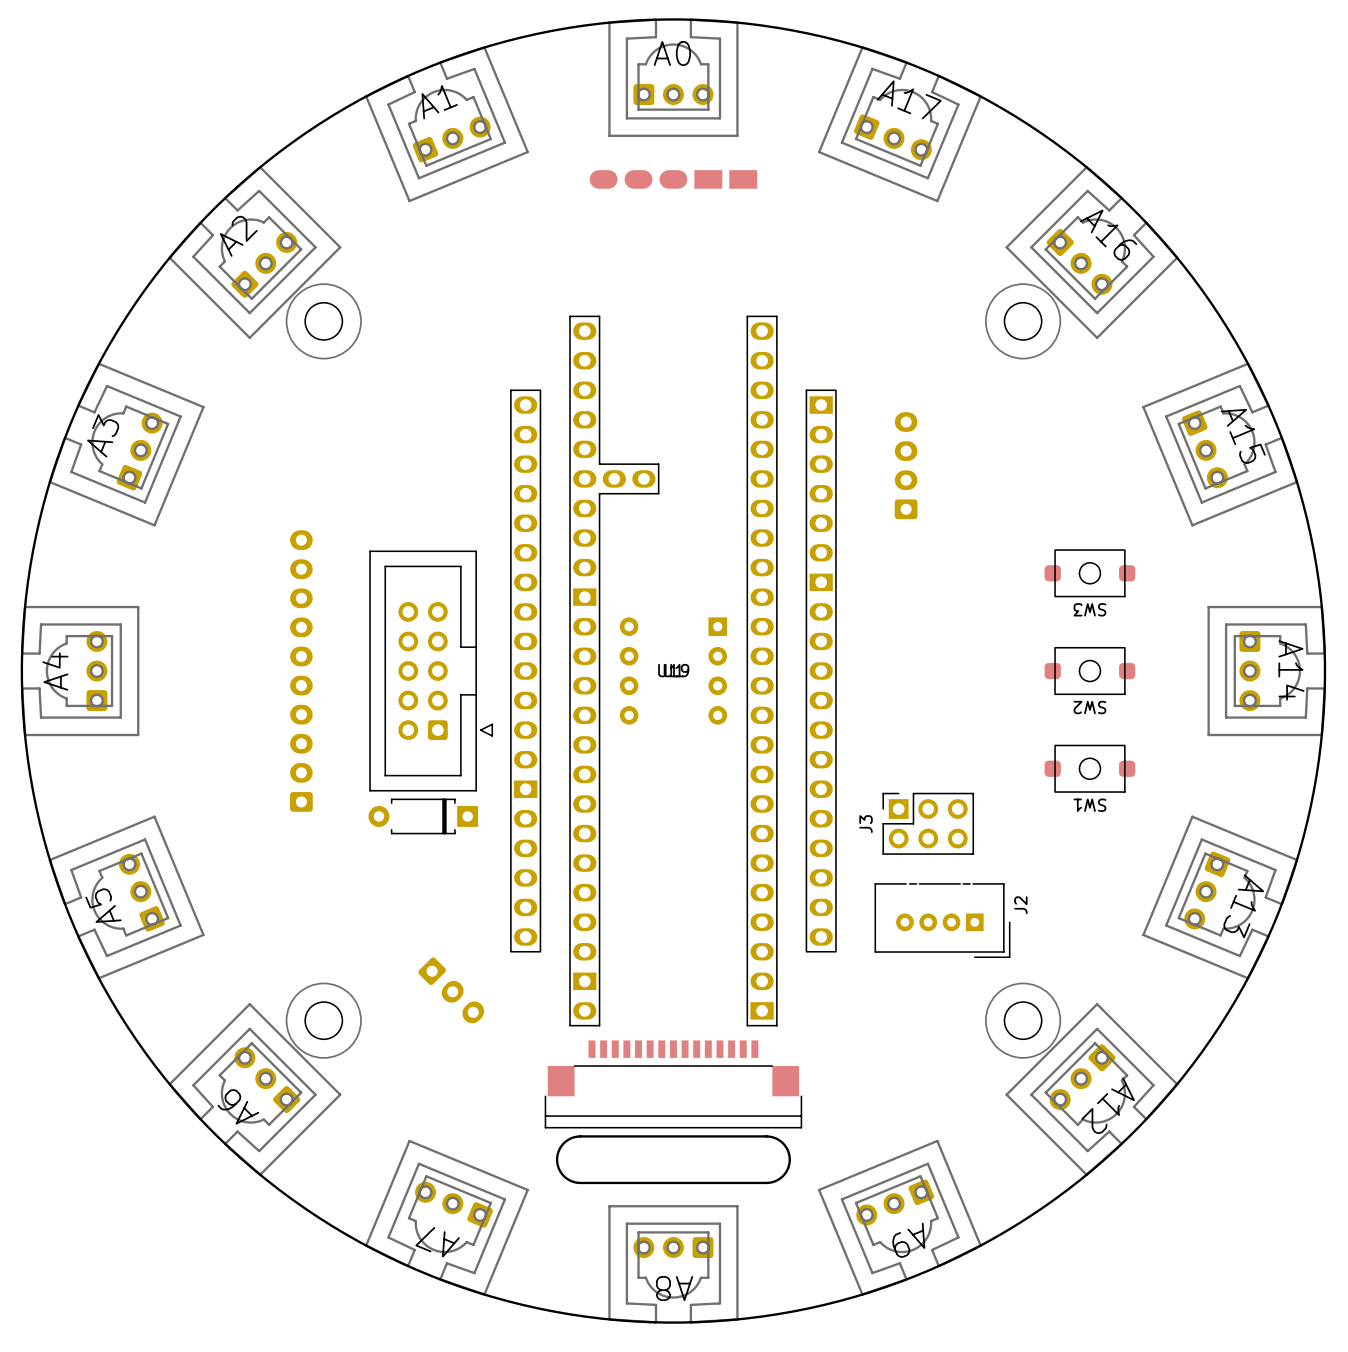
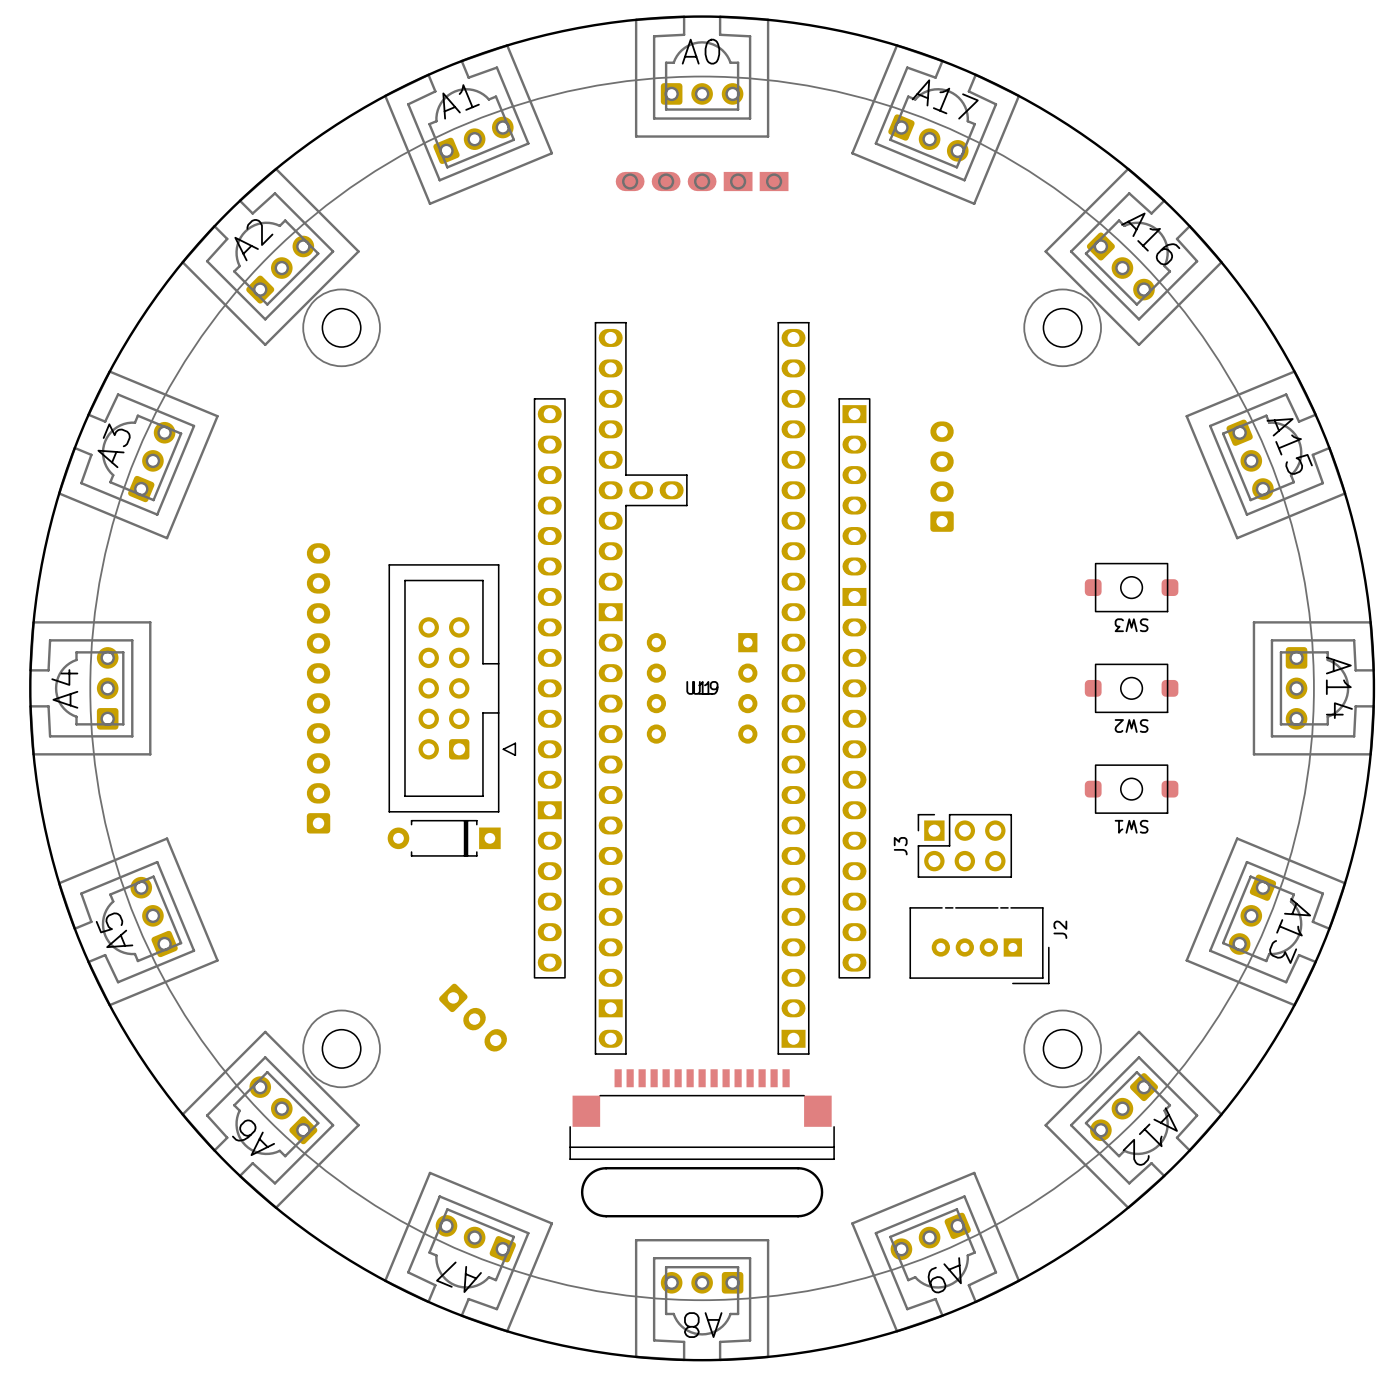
drawing: none -> [89, 75, 1315, 1302]

